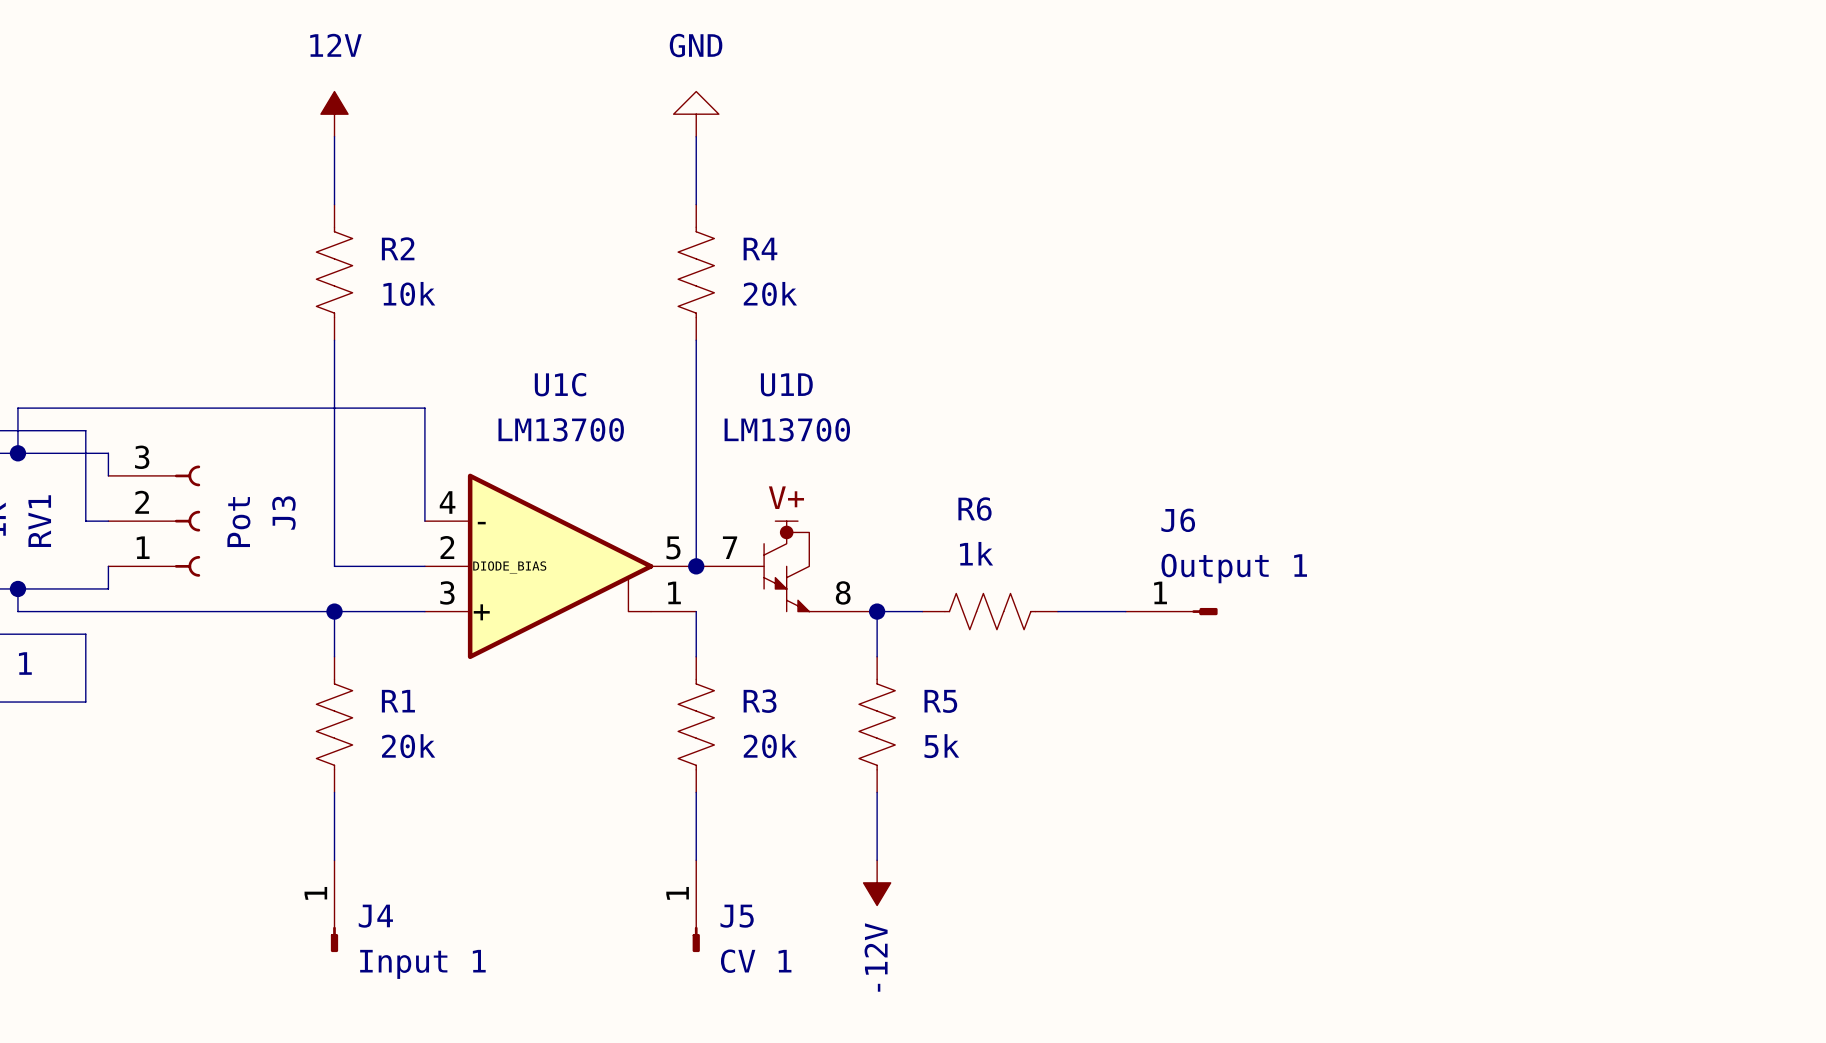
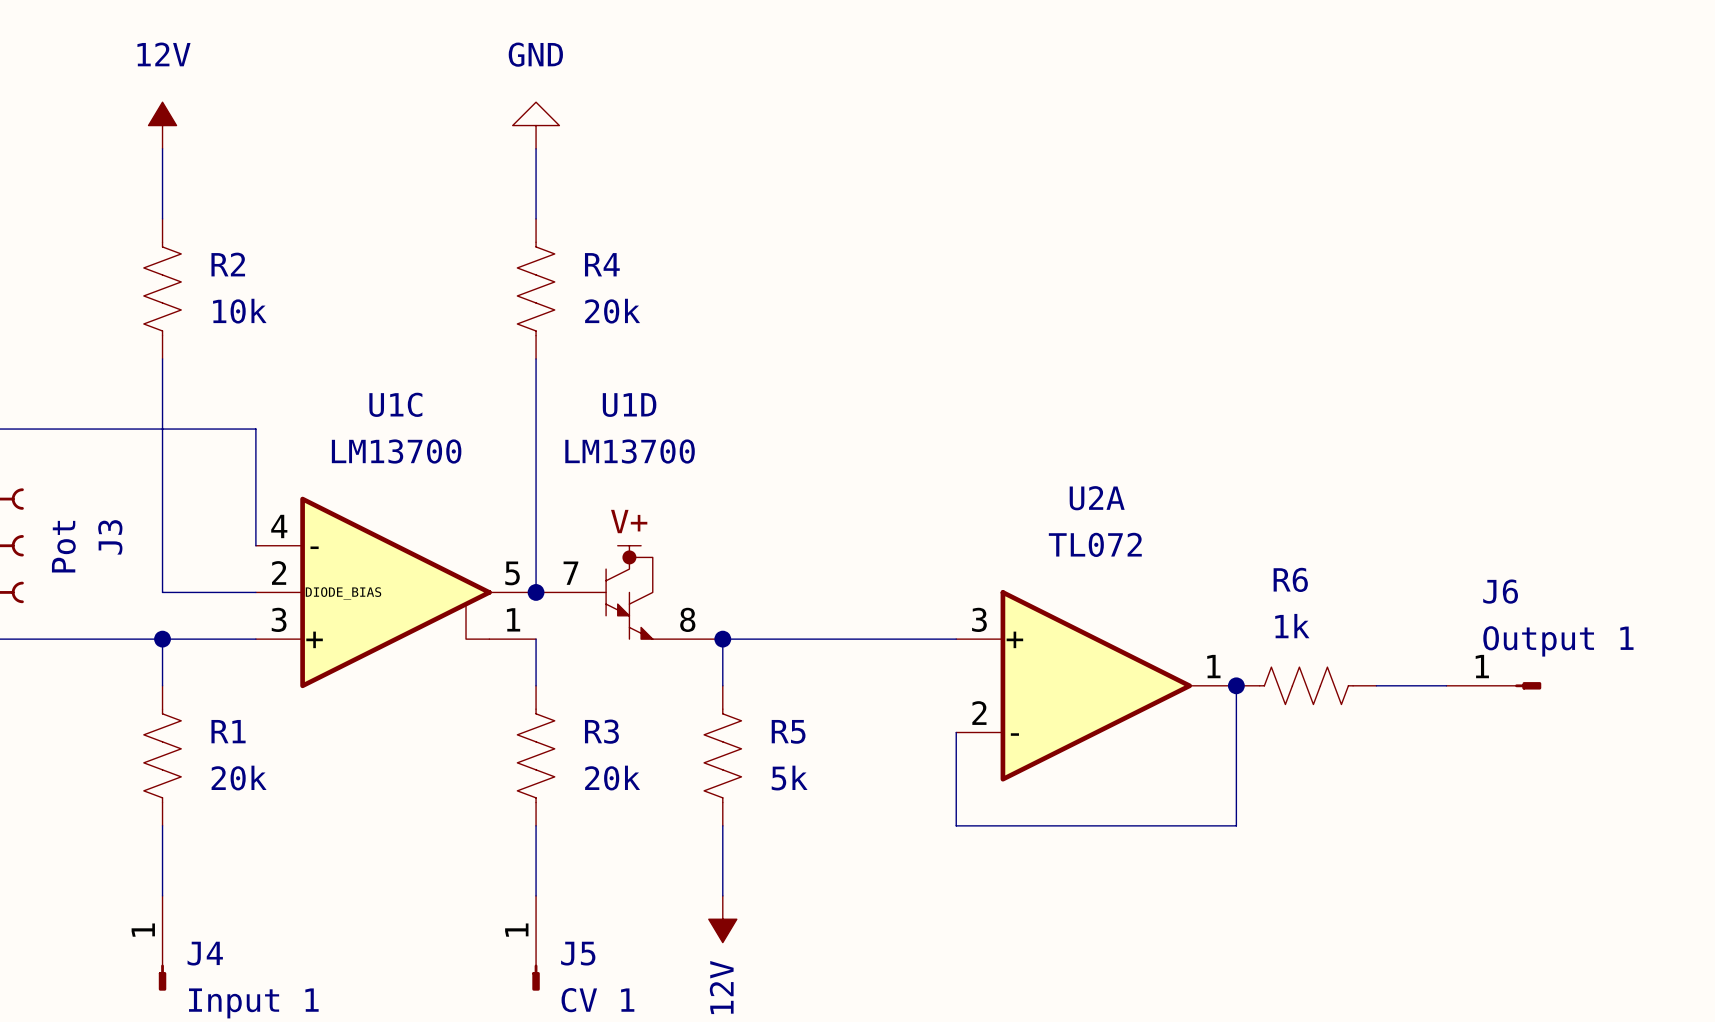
wire: none -> (769, 639) (909, 639)
R6 position: (990, 611) -> (1306, 685)
J6 position: (1171, 611) -> (1493, 685)
U2A: none -> TL072 (1096, 685)
wire: none -> (1236, 685) (1236, 825) (956, 825) (956, 732)
junction: none -> (1236, 685)
wire: none -> (1376, 685) (1446, 685)

